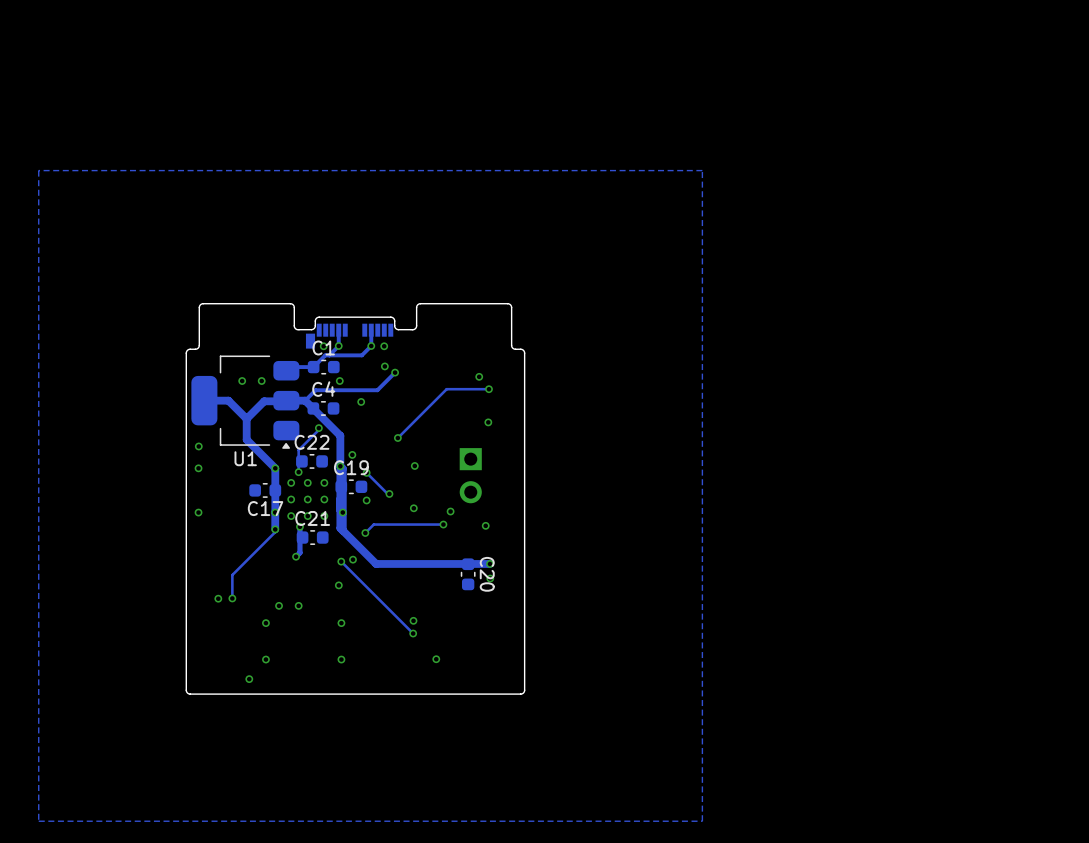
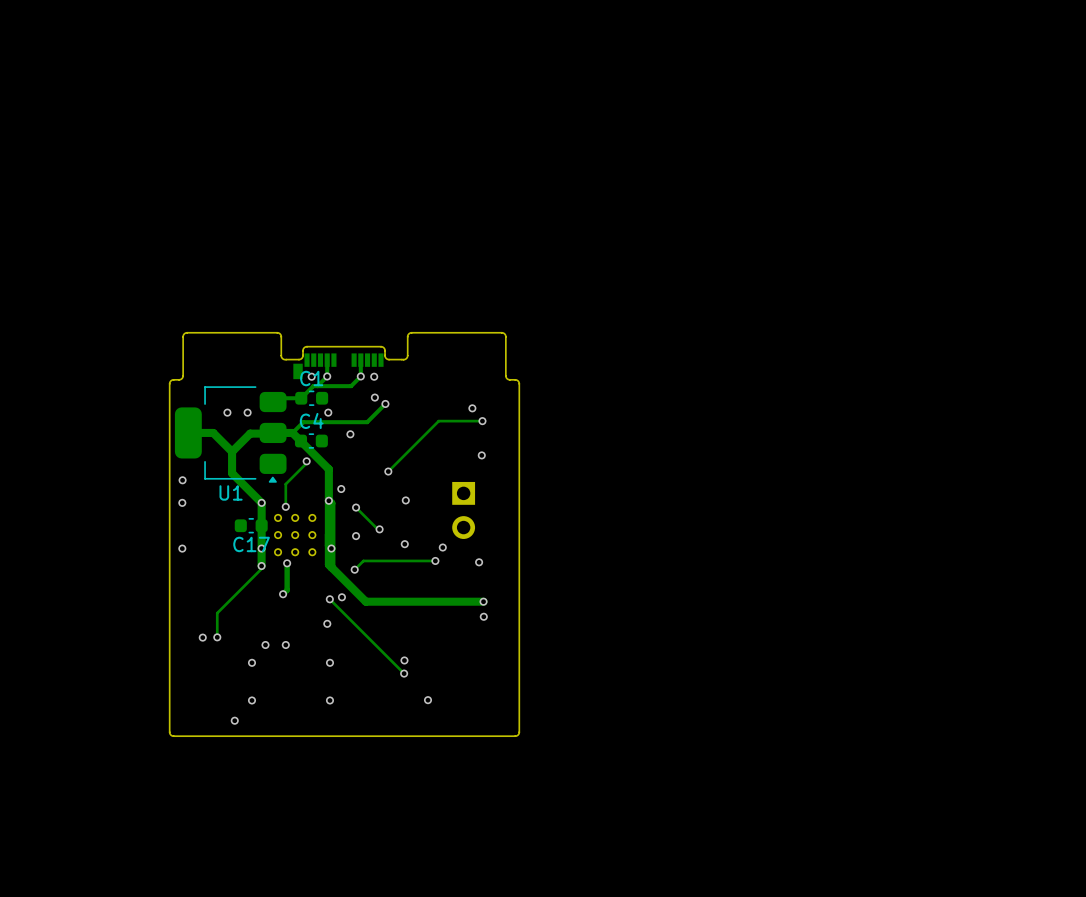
zone outline: (702, 170) (702, 821) (38, 821) (38, 170) (702, 170) -> none
C22: (312, 461) -> none
C19: (351, 486) -> none
C21: (312, 537) -> none
C20: (468, 574) -> none

